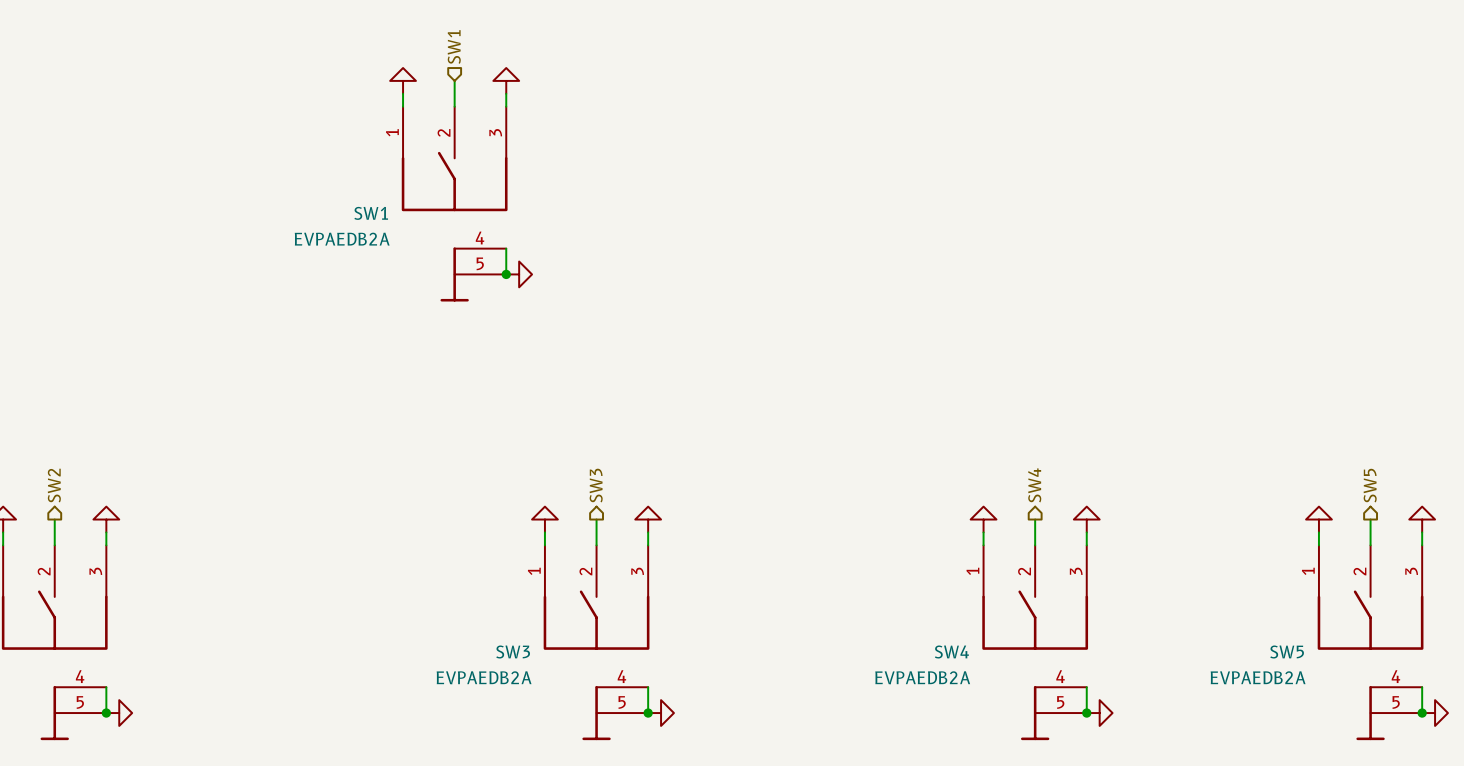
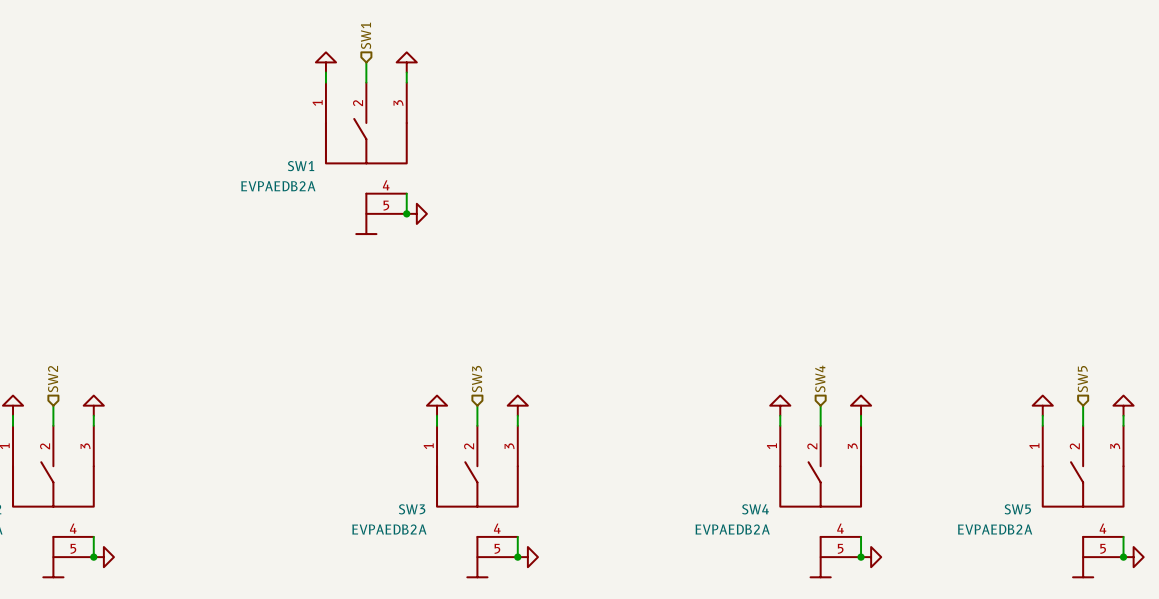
hierarchical label shape: output (54, 485) -> input (53, 379)
hierarchical label shape: output (596, 485) -> input (477, 379)
hierarchical label shape: output (1034, 485) -> input (820, 378)
hierarchical label shape: output (1370, 485) -> input (1082, 379)

